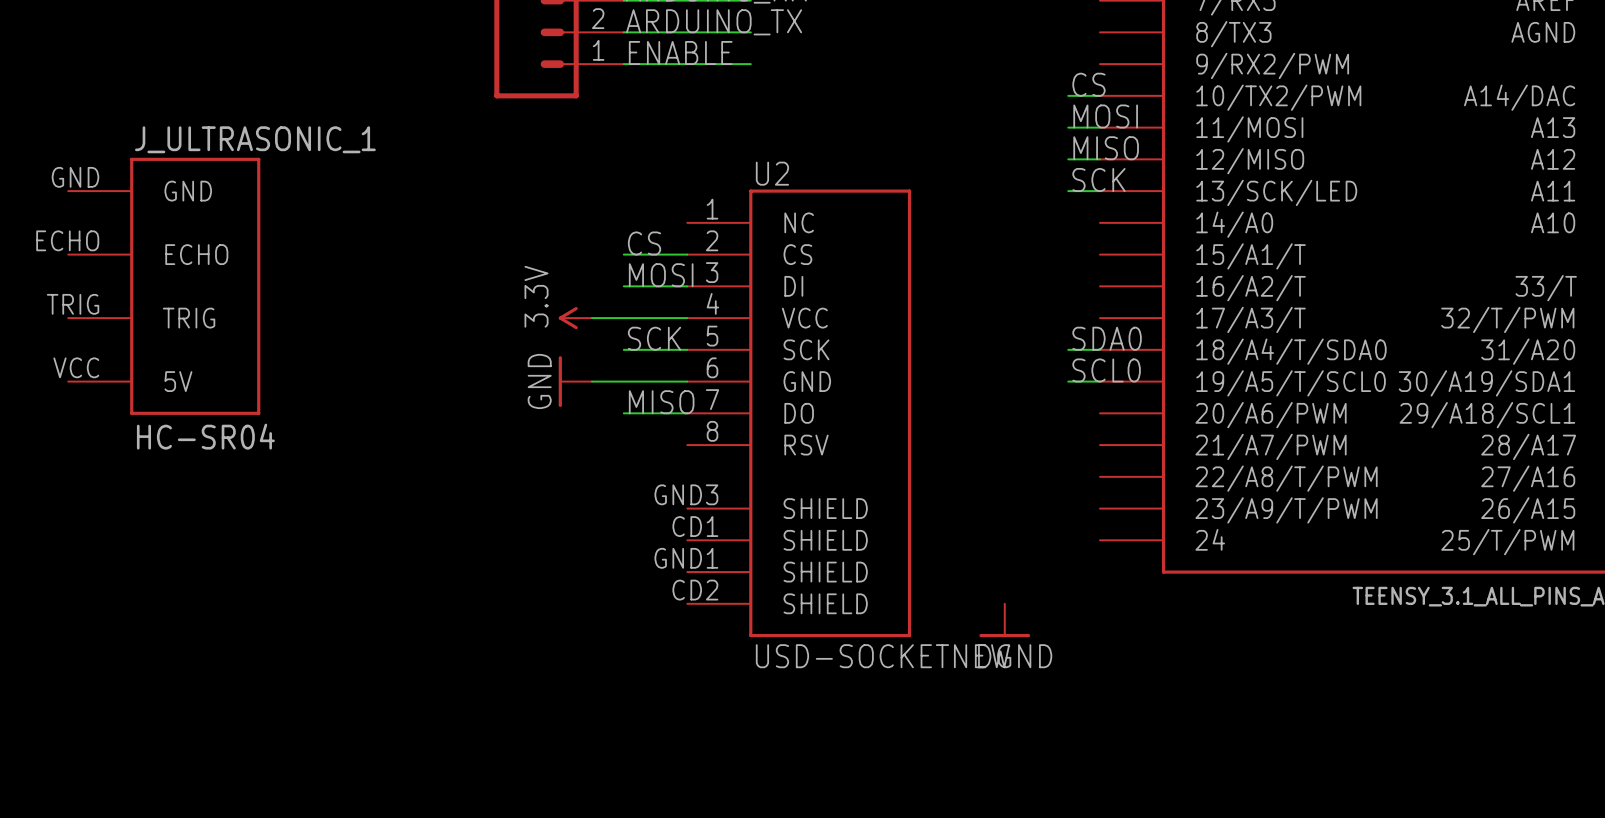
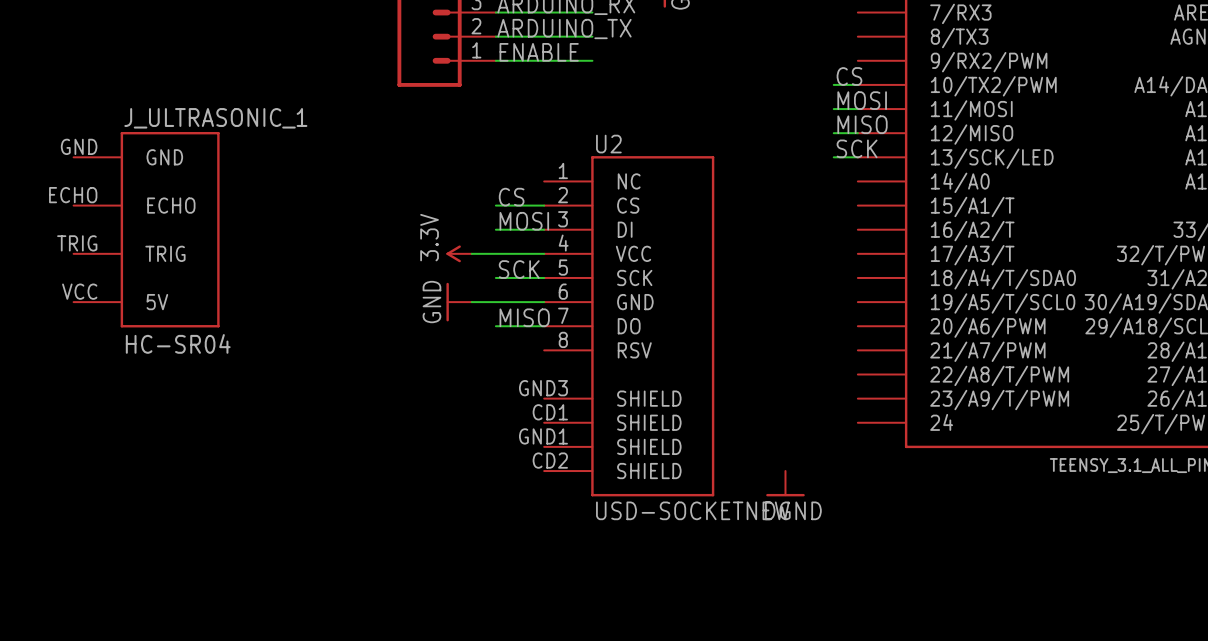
label: SDA0 (1107, 338) -> none
wire: (1068, 349) (1100, 349) -> none
label: SCL0 (1106, 370) -> none
wire: (1068, 381) (1100, 381) -> none

